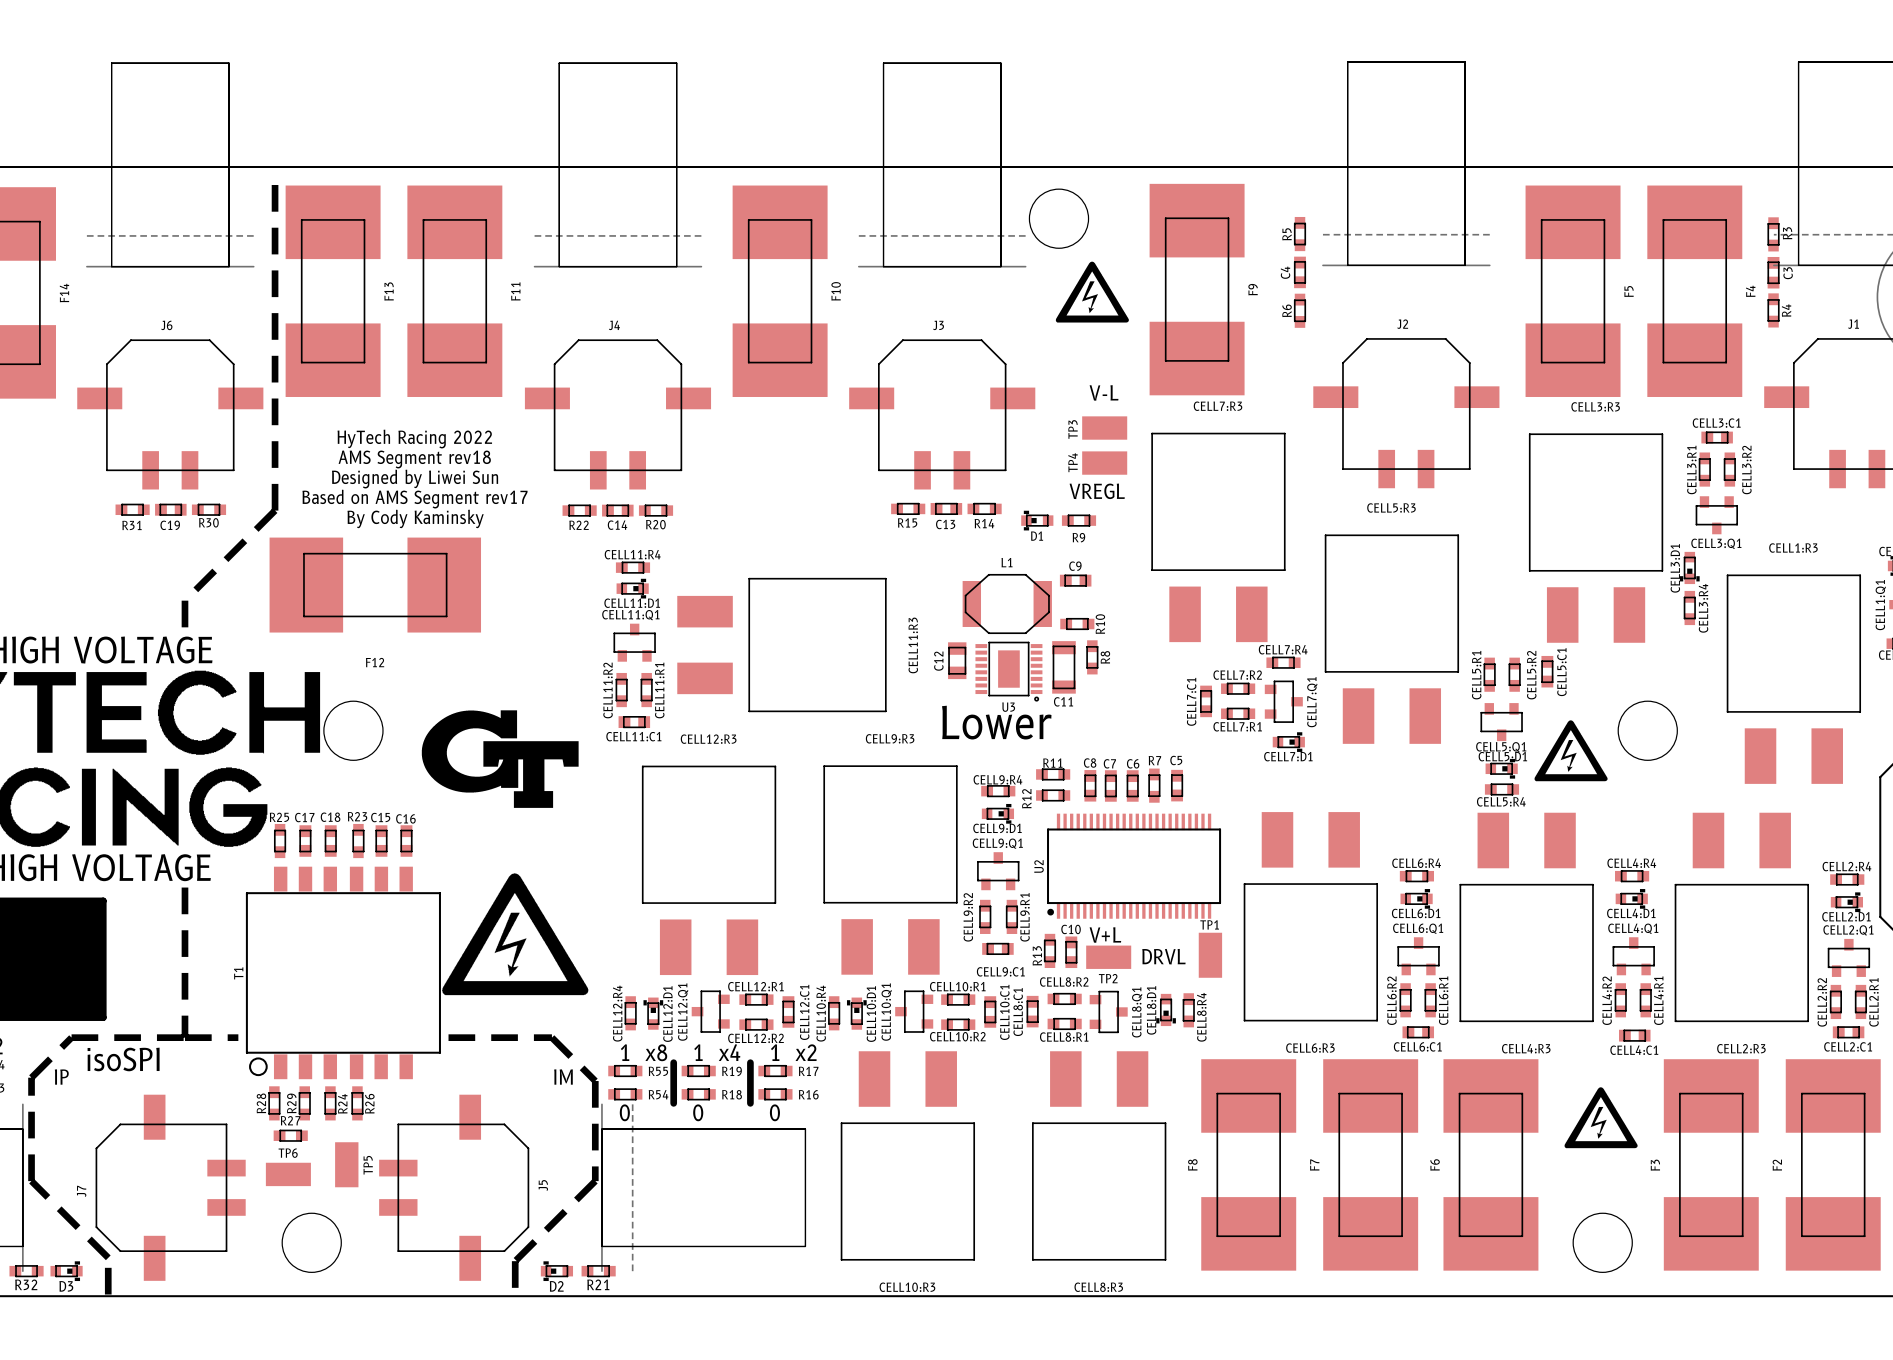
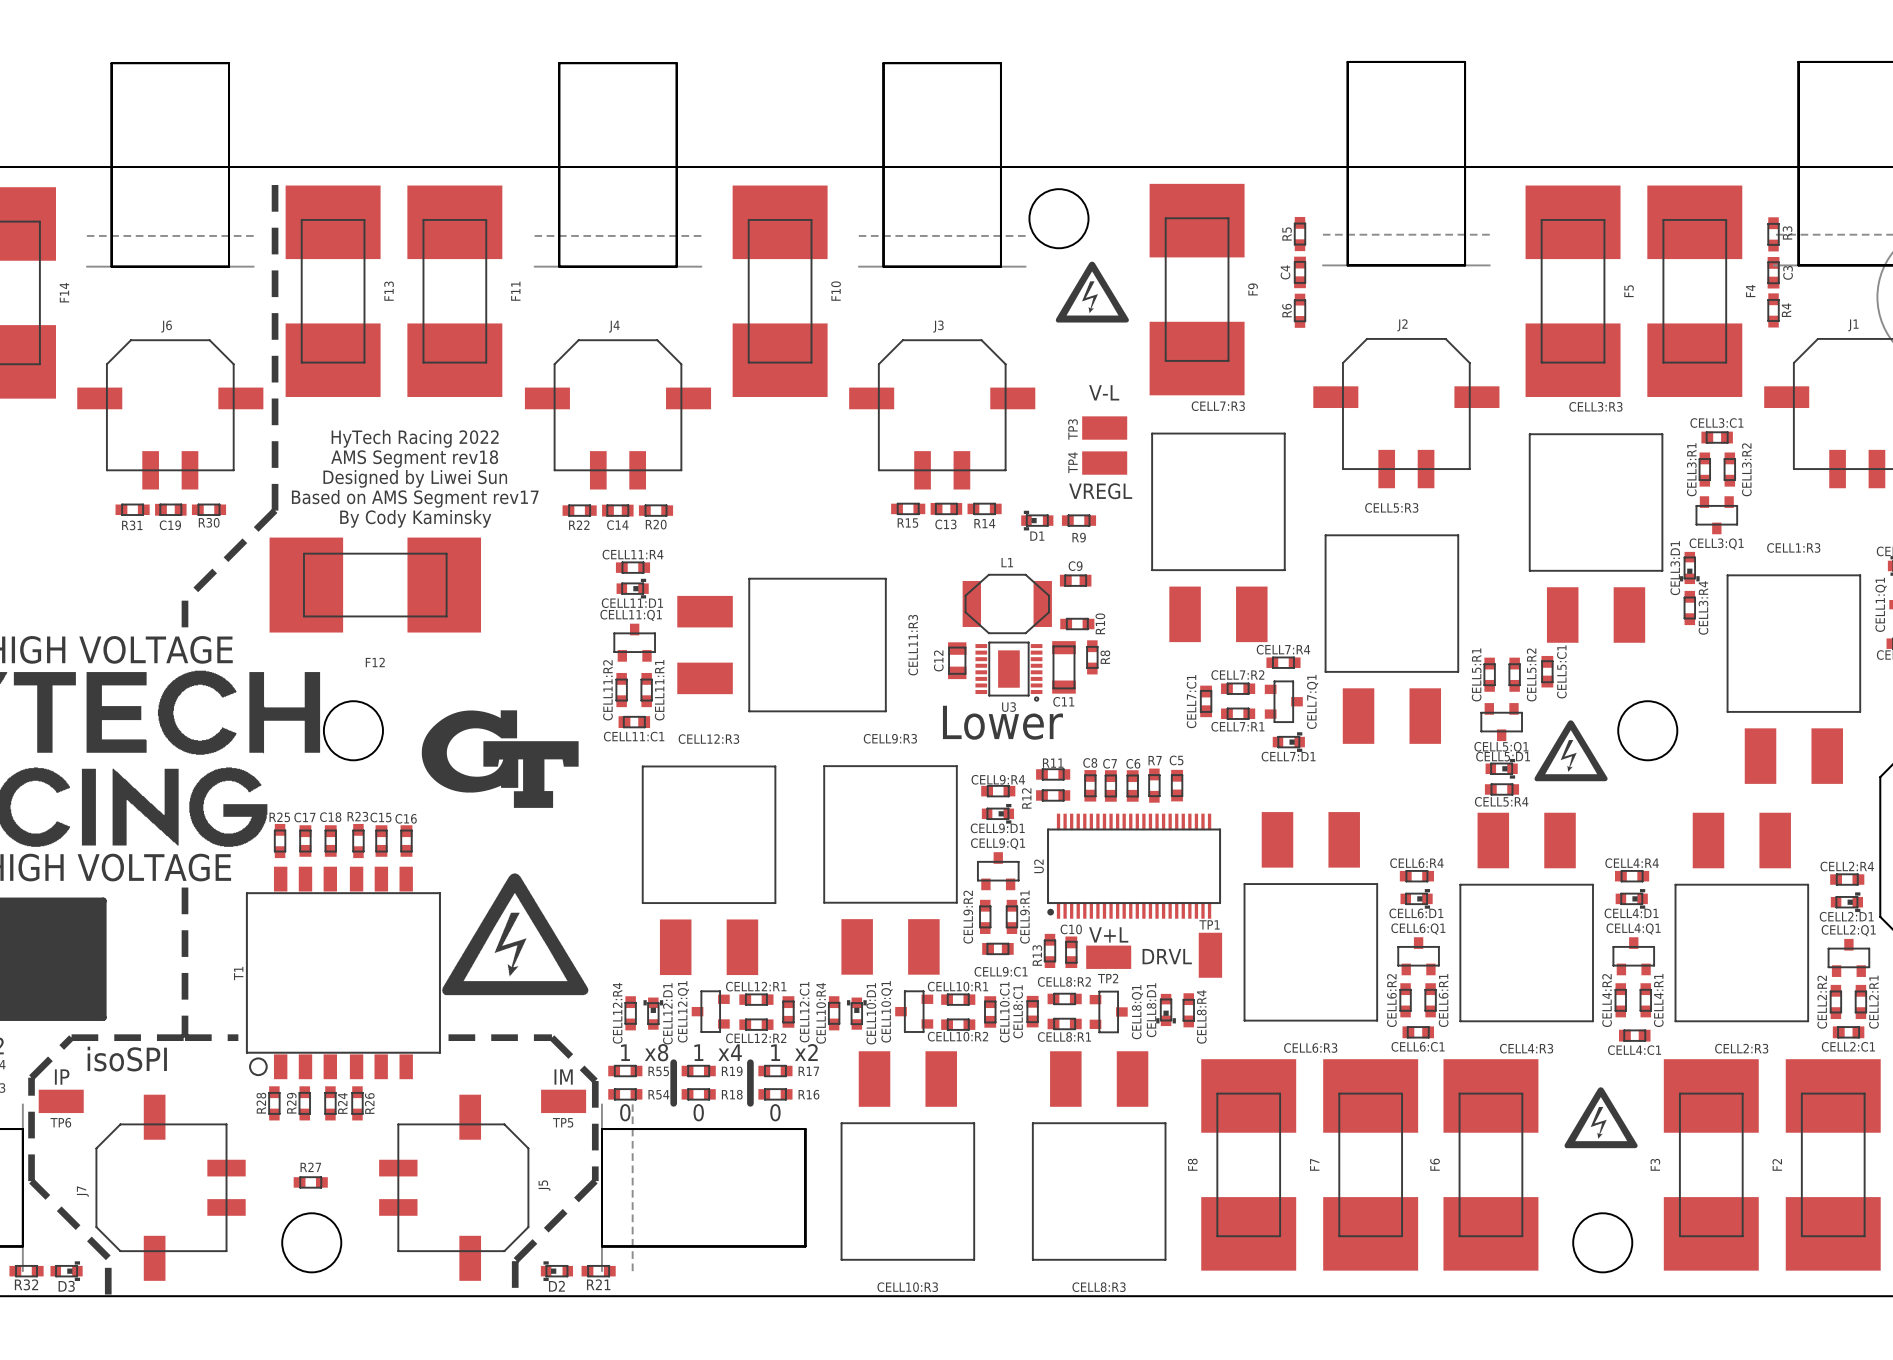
R27 position: (290, 1135) -> (310, 1182)
TP6 name position: TP6 (288, 1153) -> TP6 (60, 1122)
TP5 rotation: 0° (346, 1164) -> 90° clockwise (563, 1101)
TP5 position: (346, 1164) -> (563, 1101)
TP6 position: (288, 1174) -> (61, 1101)

